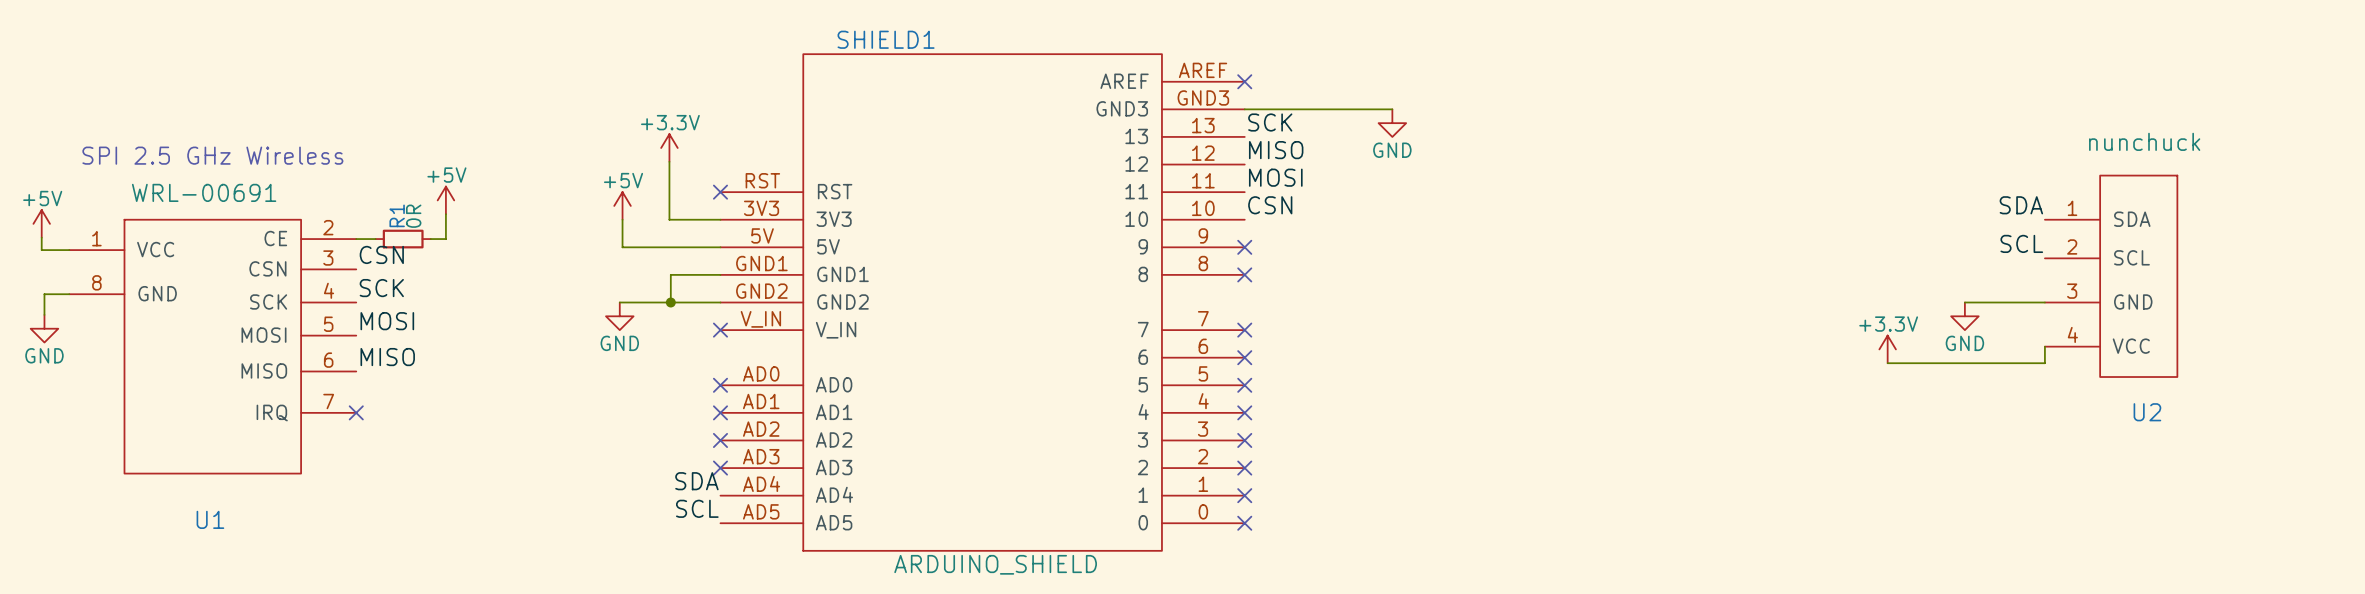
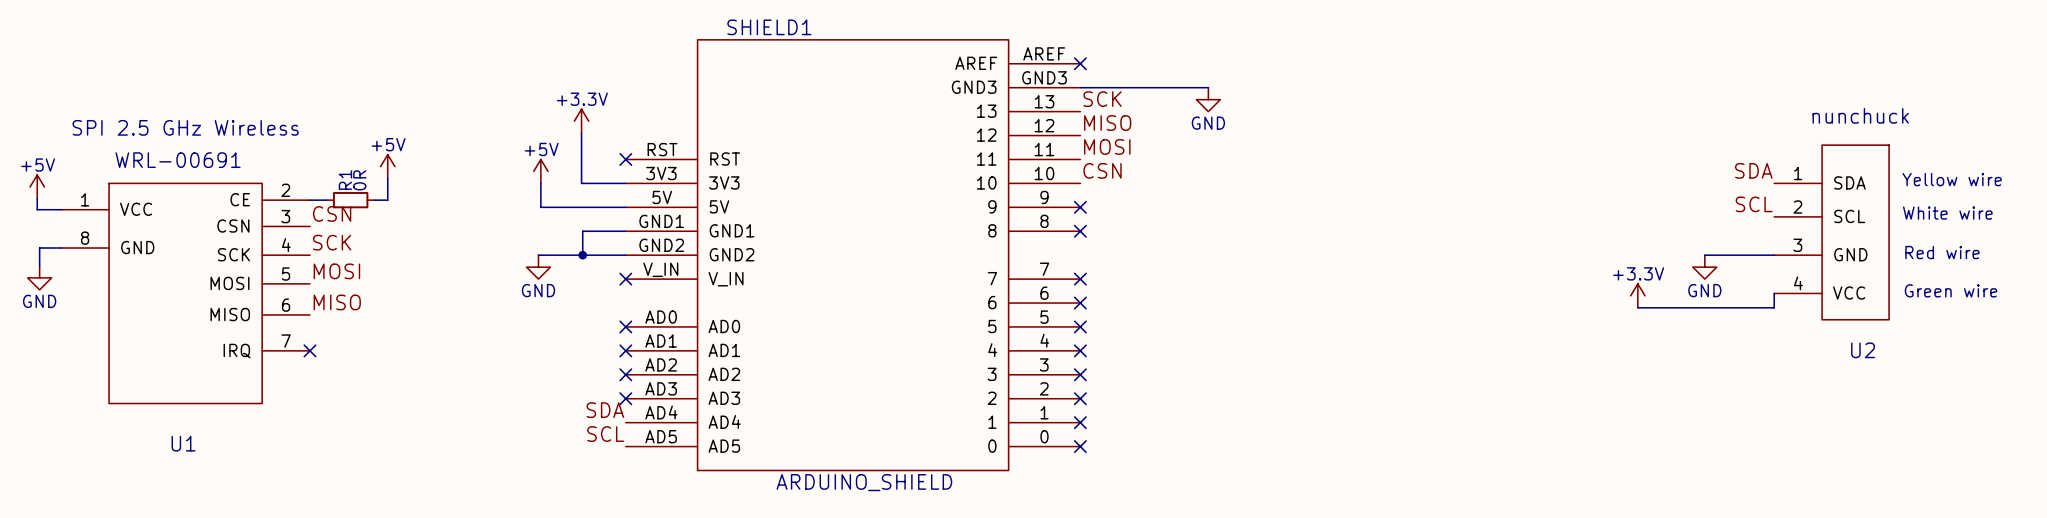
text: none -> Yellow wire (1952, 179)
text: none -> White wire (1947, 213)
text: none -> Red wire (1942, 252)
text: none -> Green wire (1951, 290)

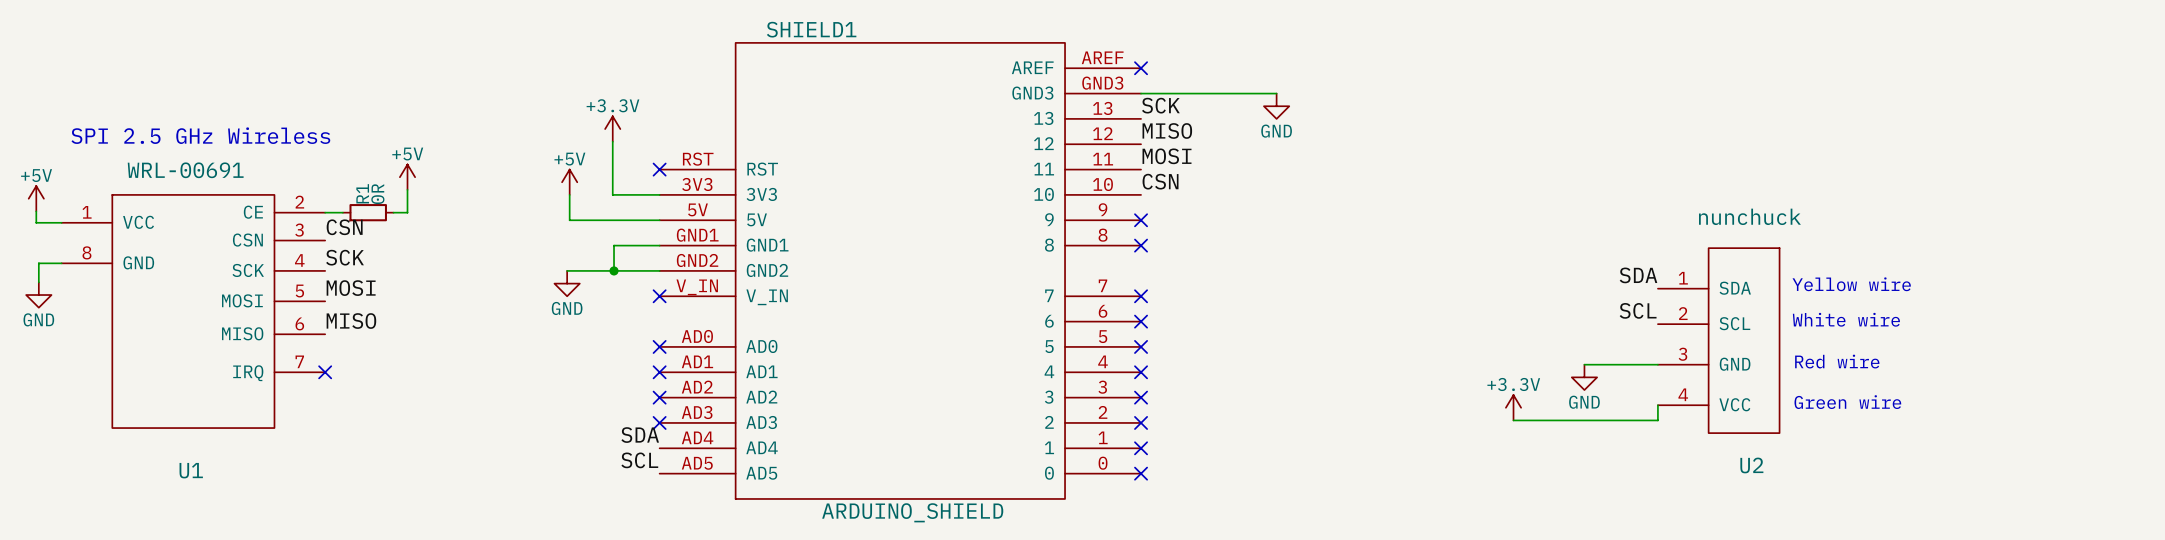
label position: SDA (1753, 170) -> SDA (1638, 275)
text position: Yellow wire (1952, 179) -> Yellow wire (1851, 284)
label position: SCL (1754, 204) -> SCL (1638, 310)
text position: White wire (1947, 213) -> White wire (1846, 319)
U2 position: (1831, 232) -> (1718, 340)
text position: Red wire (1942, 252) -> Red wire (1837, 361)
wire: (1704, 255) (1774, 255) -> (1584, 364) (1657, 364)
power symbol position: GND (1704, 267) -> GND (1584, 377)
text position: Green wire (1951, 290) -> Green wire (1847, 402)
wire: (1774, 293) (1774, 307) (1637, 307) -> (1657, 405) (1657, 420) (1513, 420)
power symbol position: +3.3V (1637, 295) -> +3.3V (1513, 407)

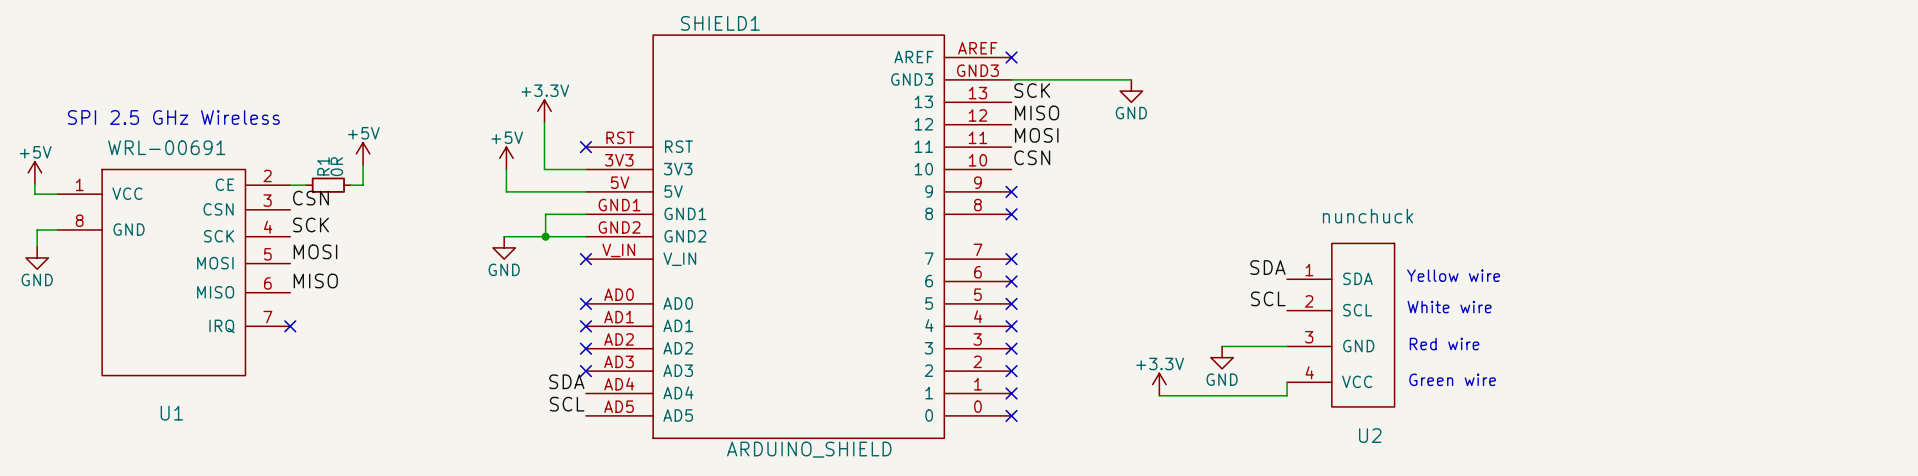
label position: SDA (1638, 275) -> SDA (1267, 267)
text position: Yellow wire (1851, 284) -> Yellow wire (1453, 275)
label position: SCL (1638, 310) -> SCL (1268, 298)
text position: White wire (1846, 319) -> White wire (1449, 307)
U2 position: (1718, 340) -> (1340, 325)
text position: Red wire (1837, 361) -> Red wire (1444, 344)
wire: (1584, 364) (1657, 364) -> (1222, 346) (1287, 346)
power symbol position: GND (1584, 377) -> GND (1222, 357)
text position: Green wire (1847, 402) -> Green wire (1452, 379)
wire: (1657, 405) (1657, 420) (1513, 420) -> (1287, 382) (1287, 395) (1159, 395)
power symbol position: +3.3V (1513, 407) -> +3.3V (1159, 384)

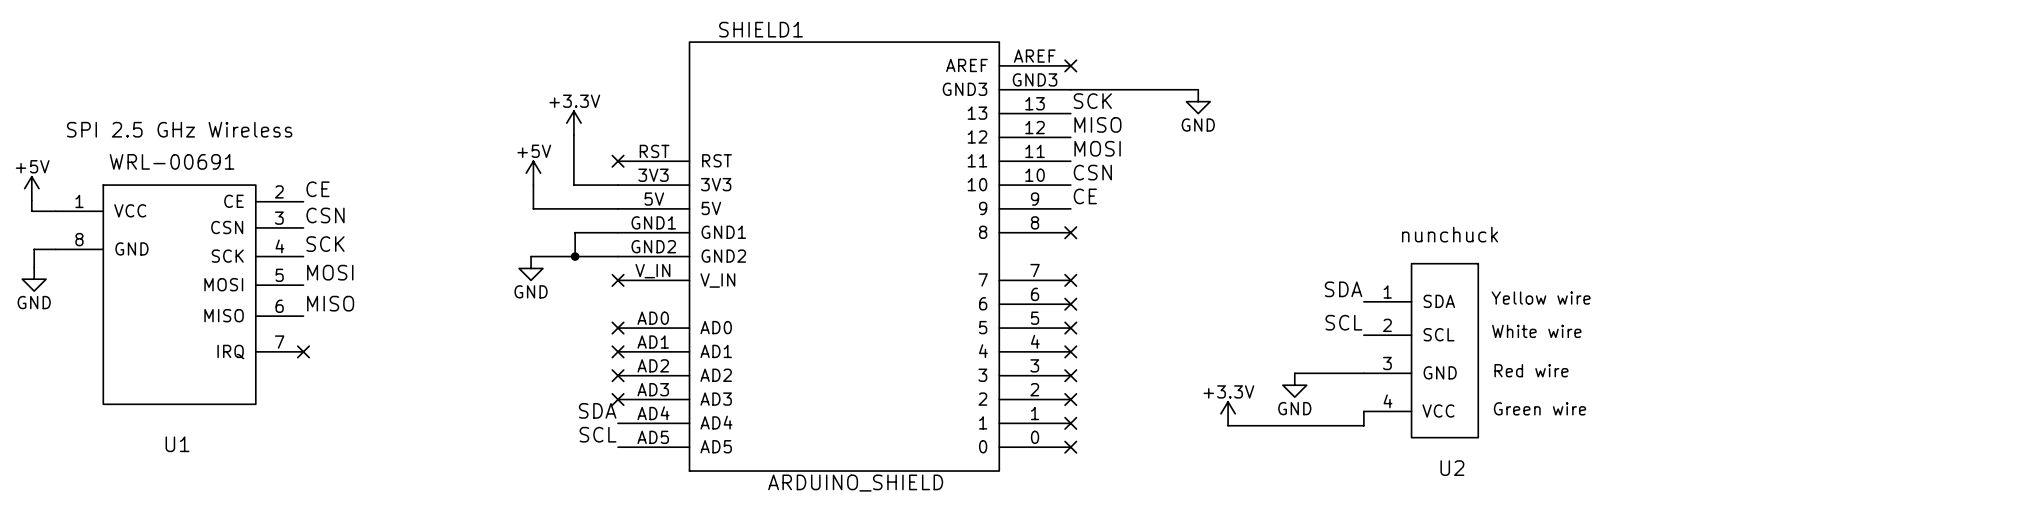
power symbol: +5V (363, 153) -> none
wire: (363, 165) (363, 185) (350, 185) -> none
label: none -> CE (318, 189)
label: none -> CE (1085, 196)
wire: (290, 185) (305, 185) -> none
R1: 0R (328, 185) -> none
no-connect mark: (1011, 191) -> none

